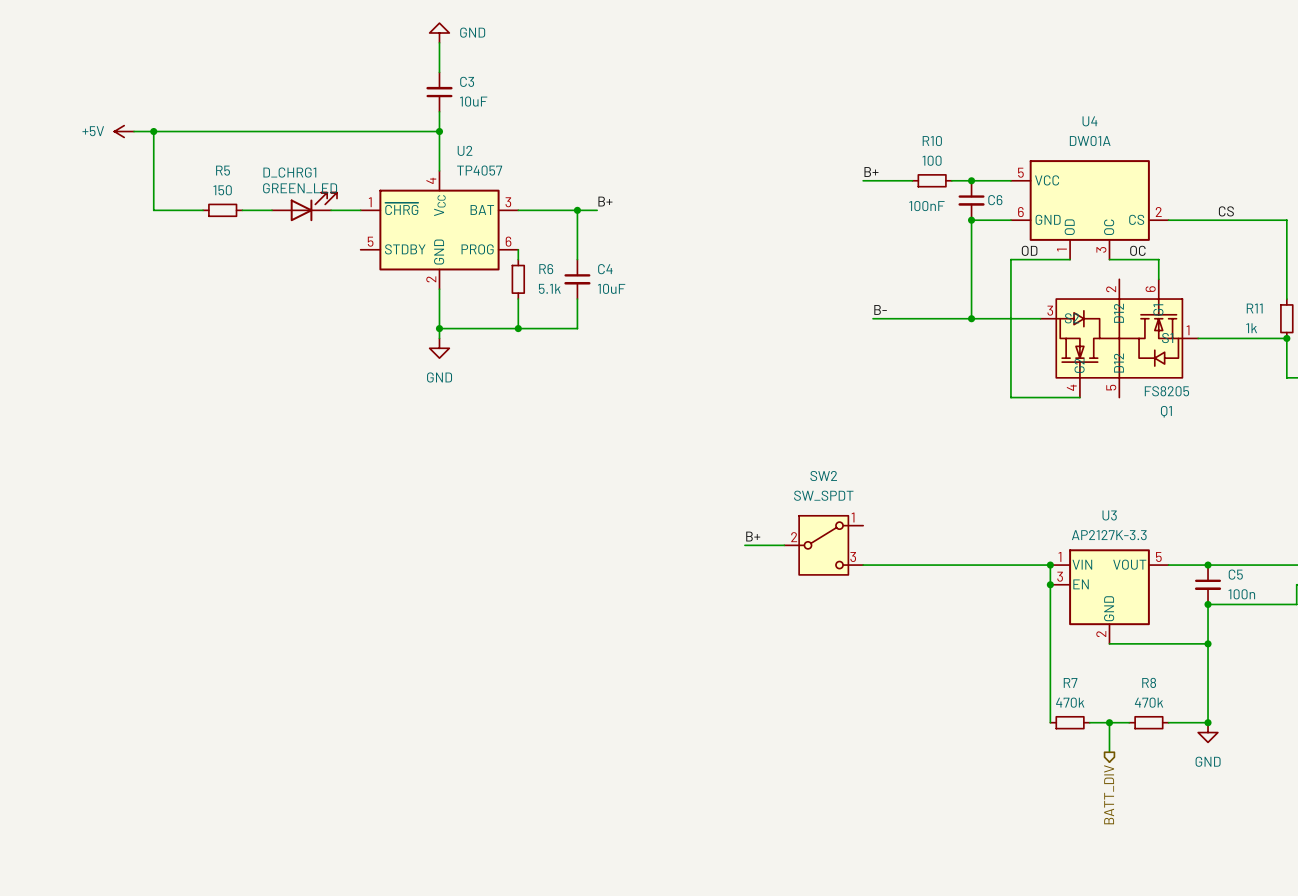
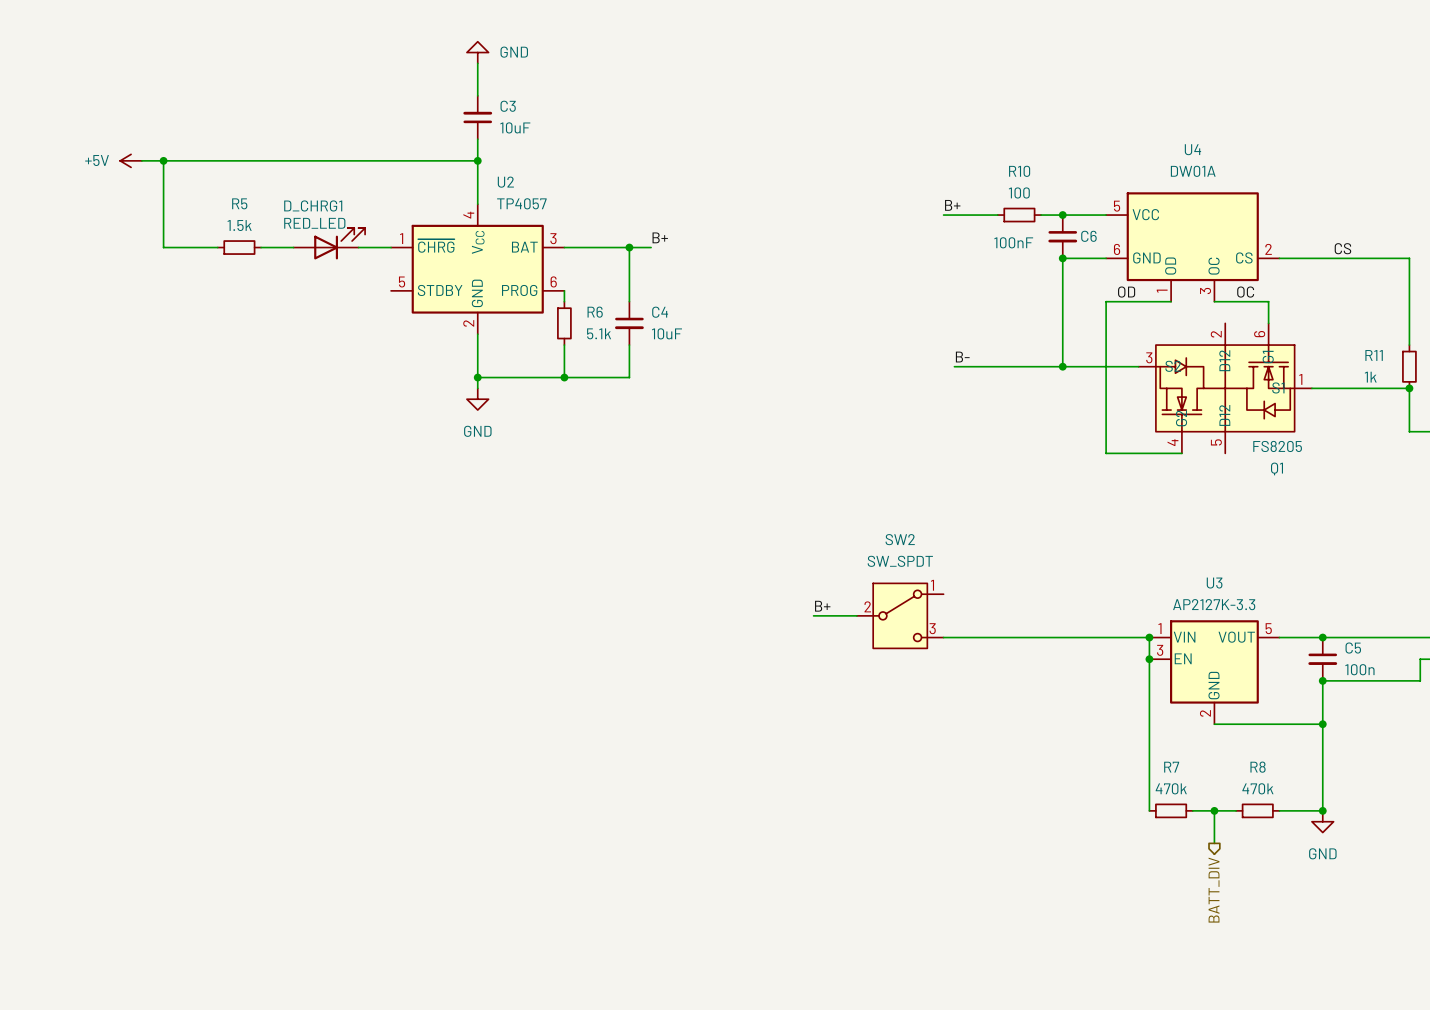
D_CHRG1 value: GREEN_LED (300, 188) -> RED_LED (314, 223)
R5 value: 150 (222, 190) -> 1.5k (239, 225)

